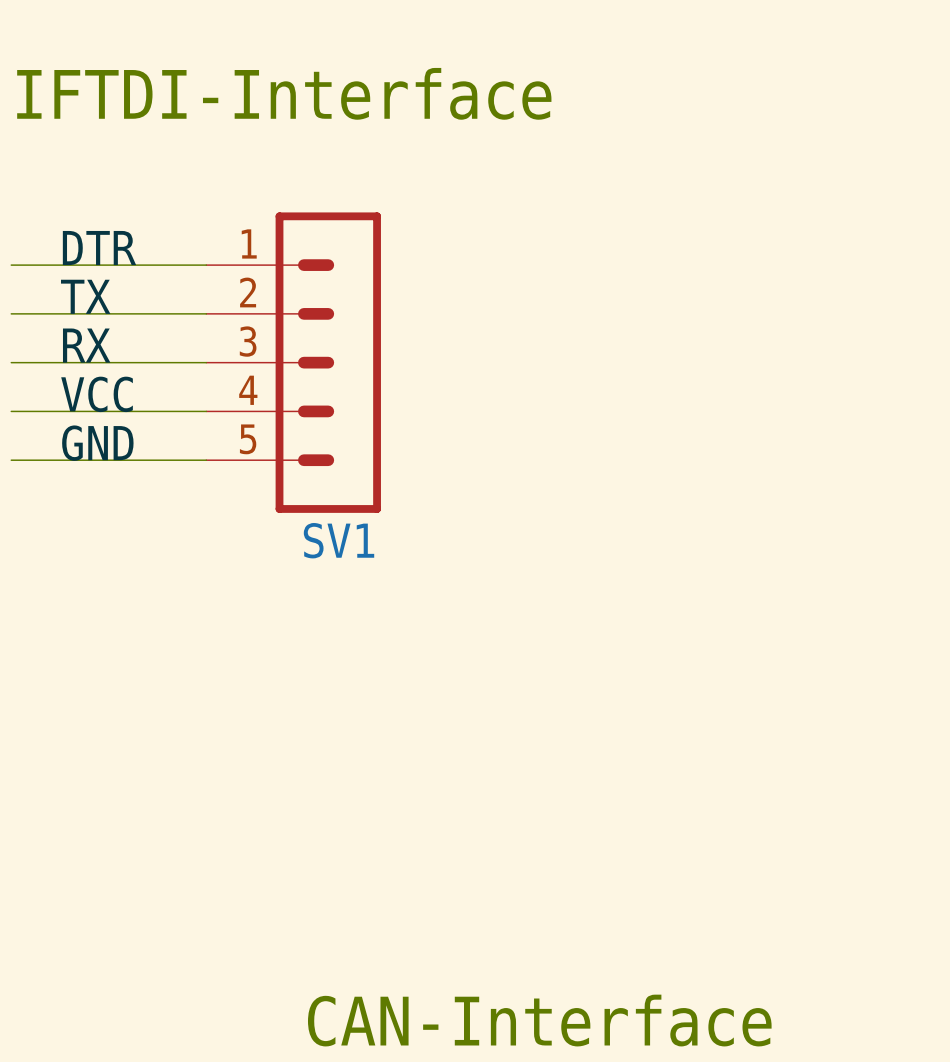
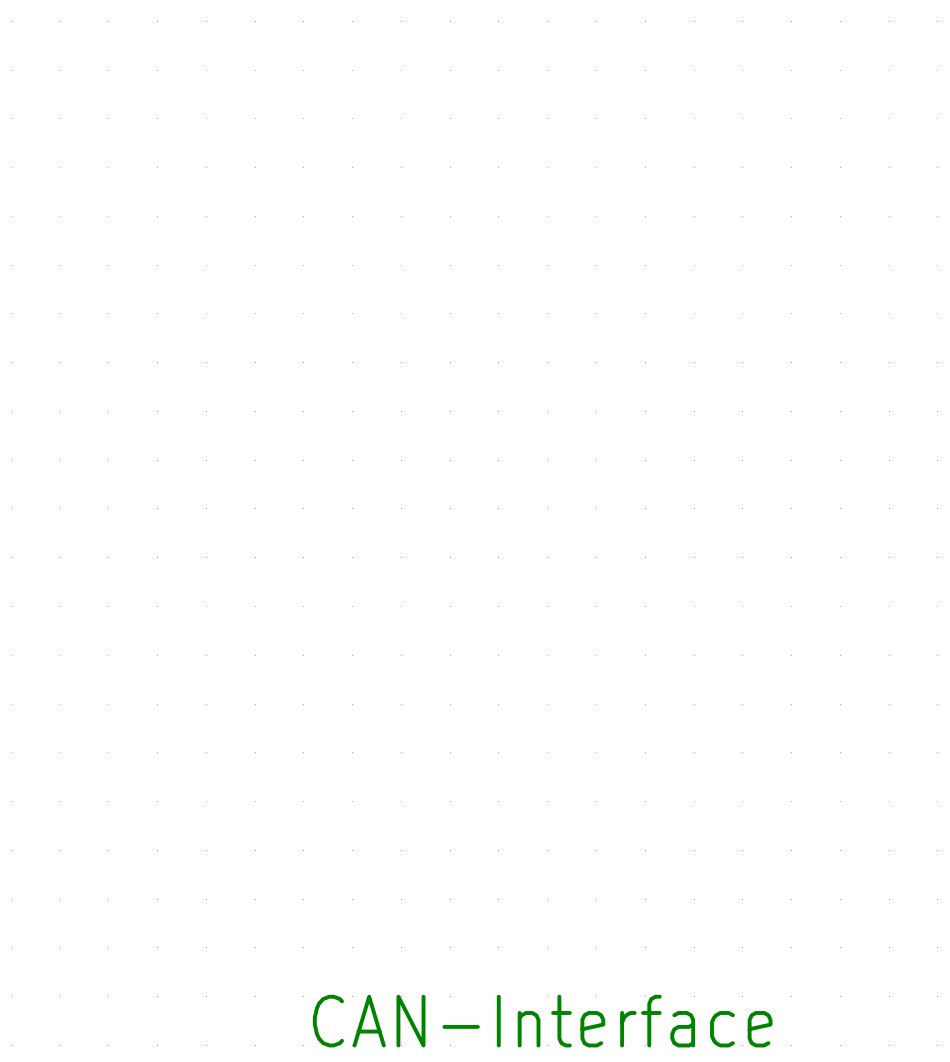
text: IFTDI-Interface (284, 93) -> none
label: DTR (99, 248) -> none
wire: (11, 265) (206, 265) -> none
label: TX (85, 296) -> none
wire: (11, 313) (206, 313) -> none
label: RX (86, 345) -> none
wire: (11, 362) (206, 362) -> none
SV1: (293, 362) -> none
label: VCC (97, 394) -> none
wire: (11, 411) (206, 411) -> none
label: GND (97, 443) -> none
wire: (11, 460) (206, 460) -> none

